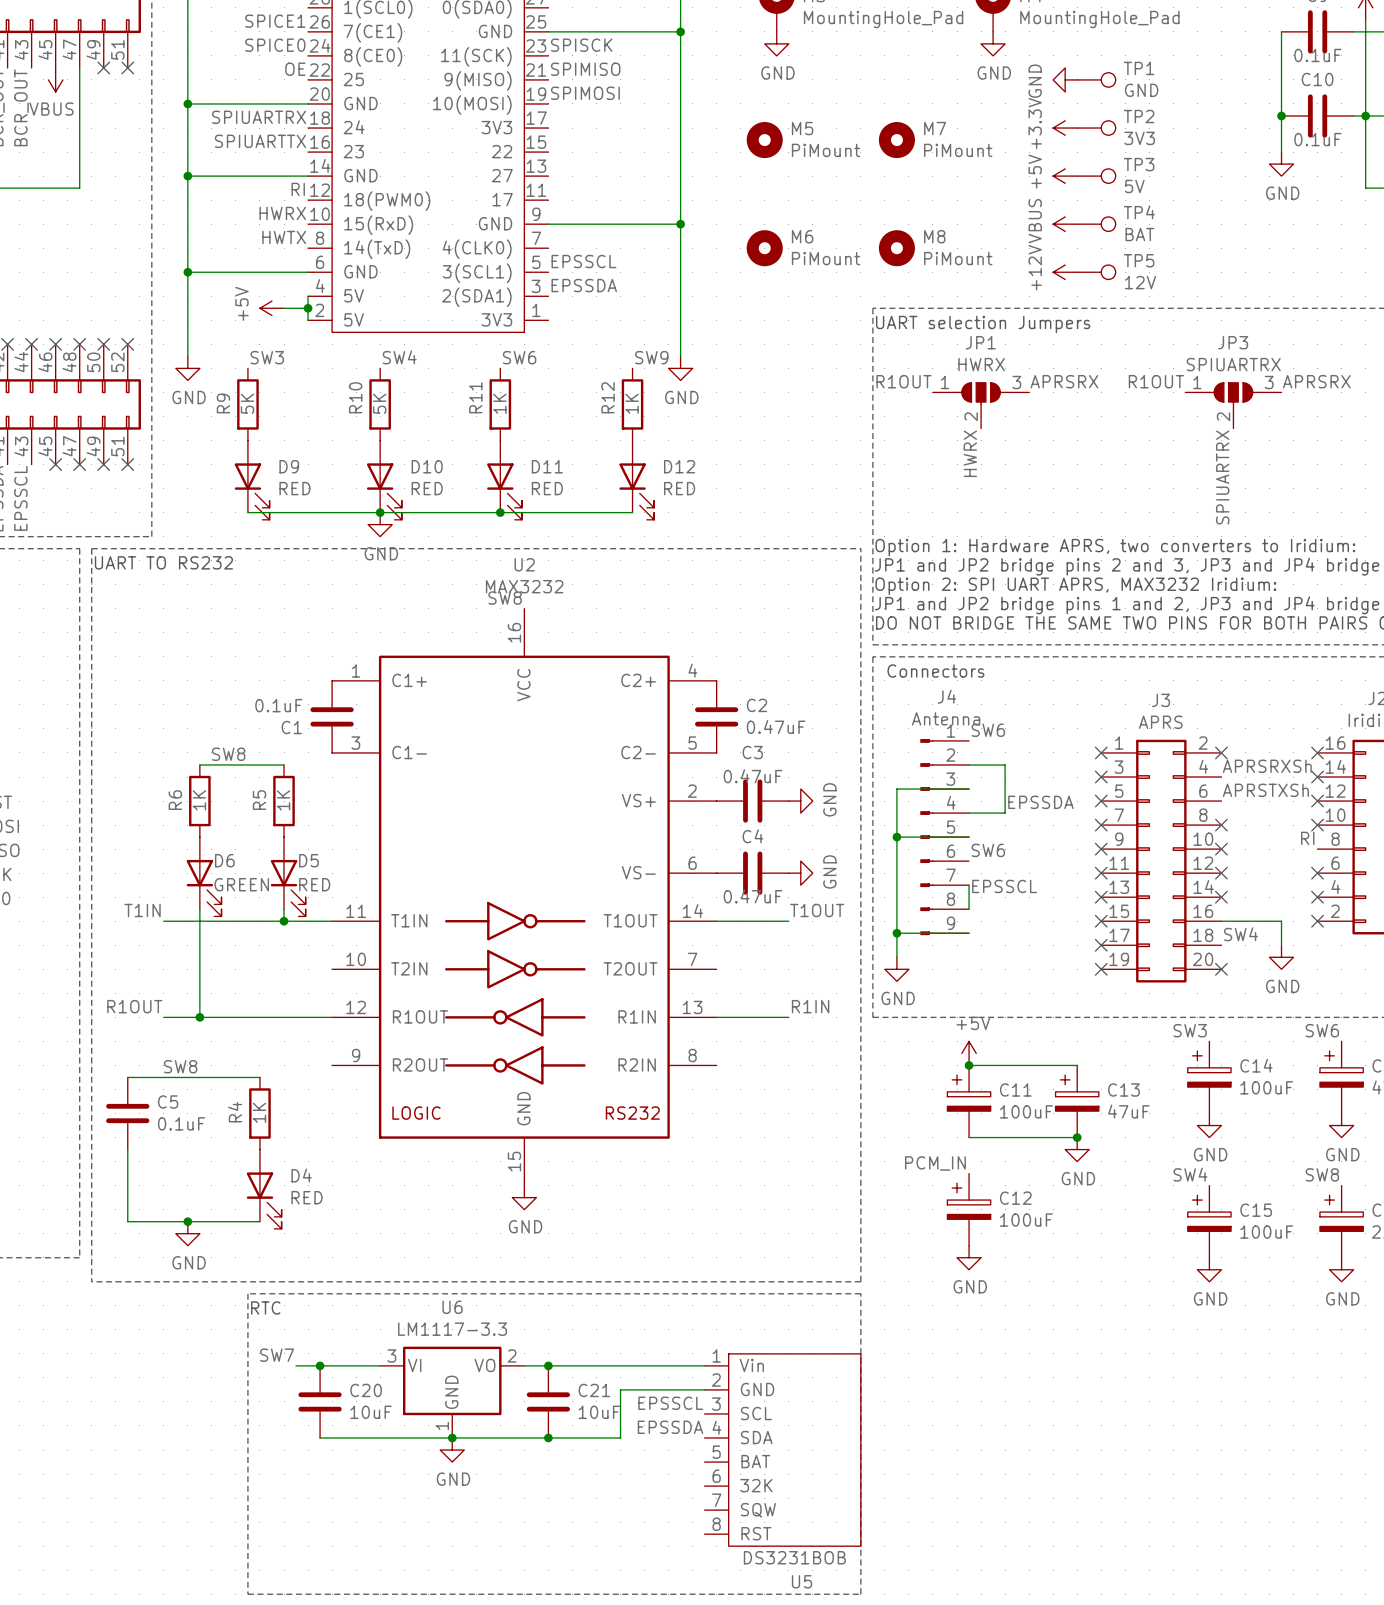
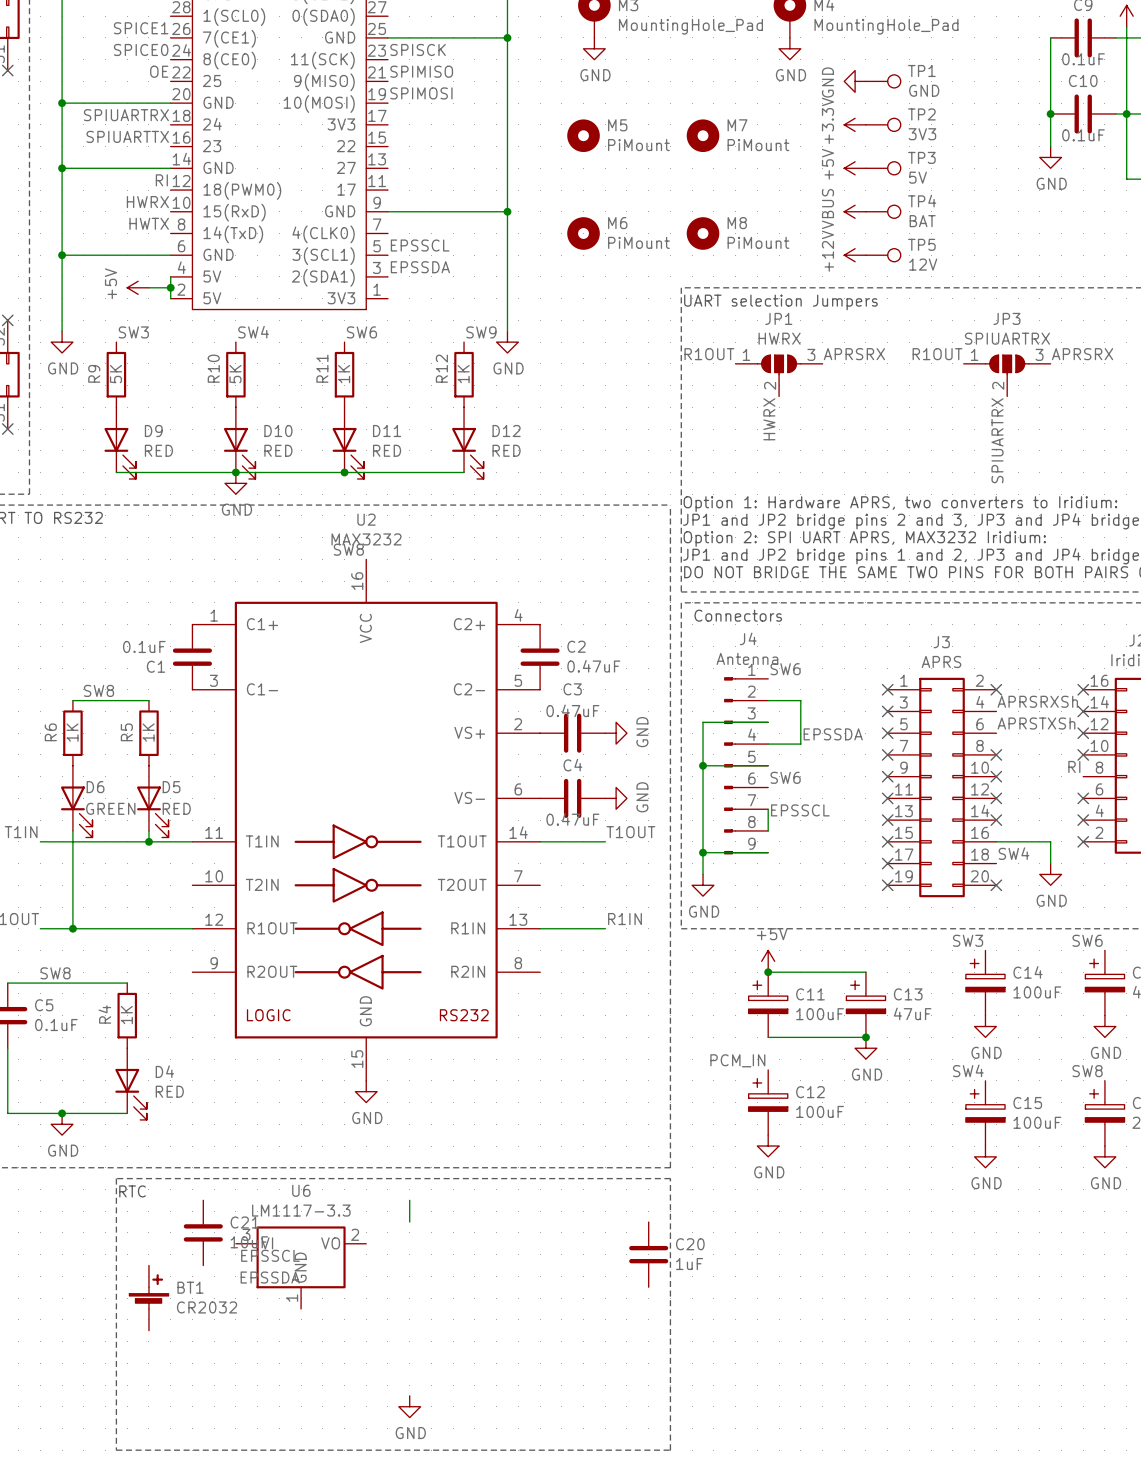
wire: none -> (409, 1200) (409, 1222)
label: SW7 (277, 1355) -> none
wire: (296, 1365) (380, 1365) -> none
junction: (320, 1365) -> none
wire: (524, 1365) (704, 1365) -> none
junction: (548, 1365) -> none
label: none -> EPSSCL (270, 1255)
wire: (704, 1389) (620, 1389) (620, 1438) (320, 1438) -> none
C20 position: (320, 1401) -> (648, 1254)
C21 position: (548, 1401) -> (203, 1232)
label: none -> EPSSDA (270, 1277)
label: EPSSCL (670, 1403) -> none
C20 value: 10uF (370, 1412) -> 1uF (689, 1264)
BT1: none -> CR2032 (148, 1298)
label: EPSSDA (670, 1427) -> none
junction: (452, 1438) -> none
junction: (548, 1438) -> none
power symbol position: GND (452, 1450) -> GND (409, 1406)
U5: DS3231BOB (782, 1450) -> none

